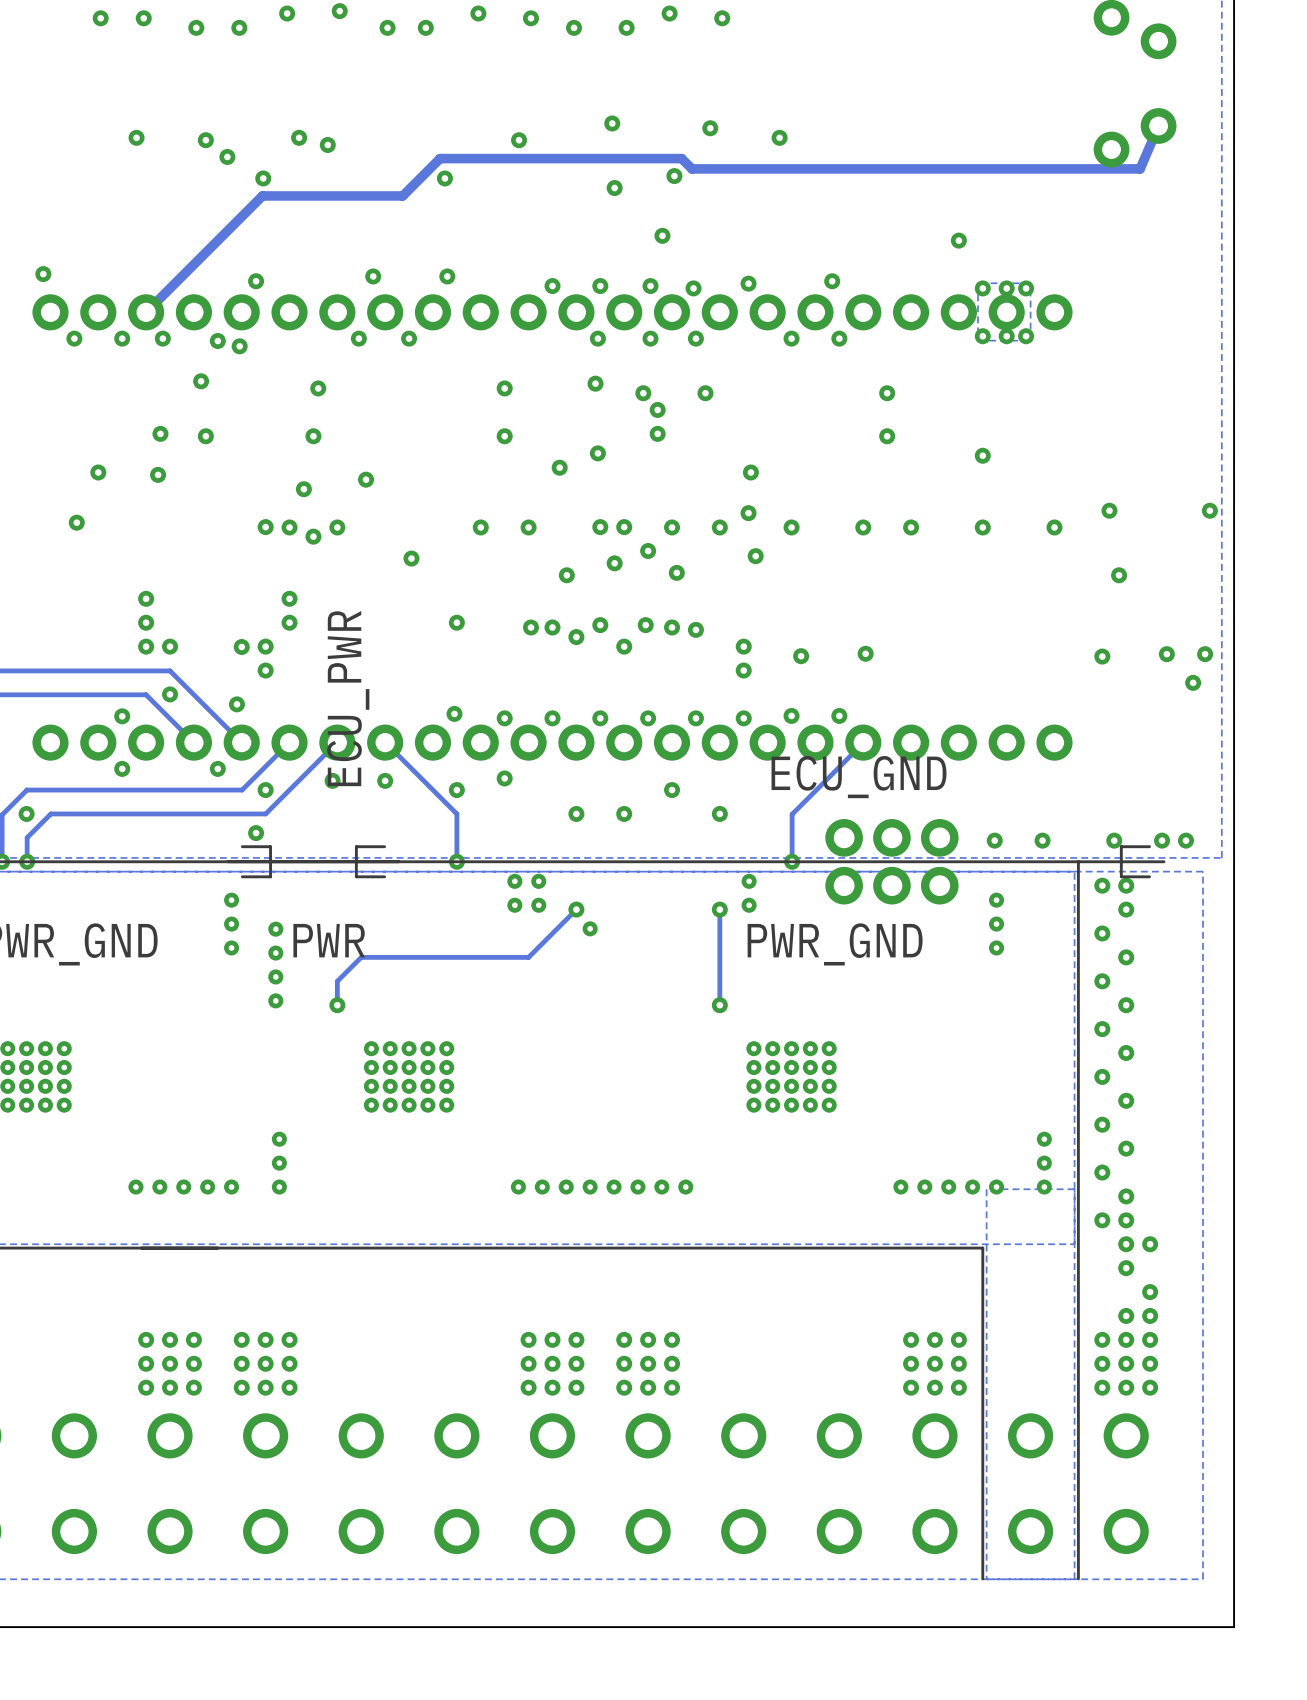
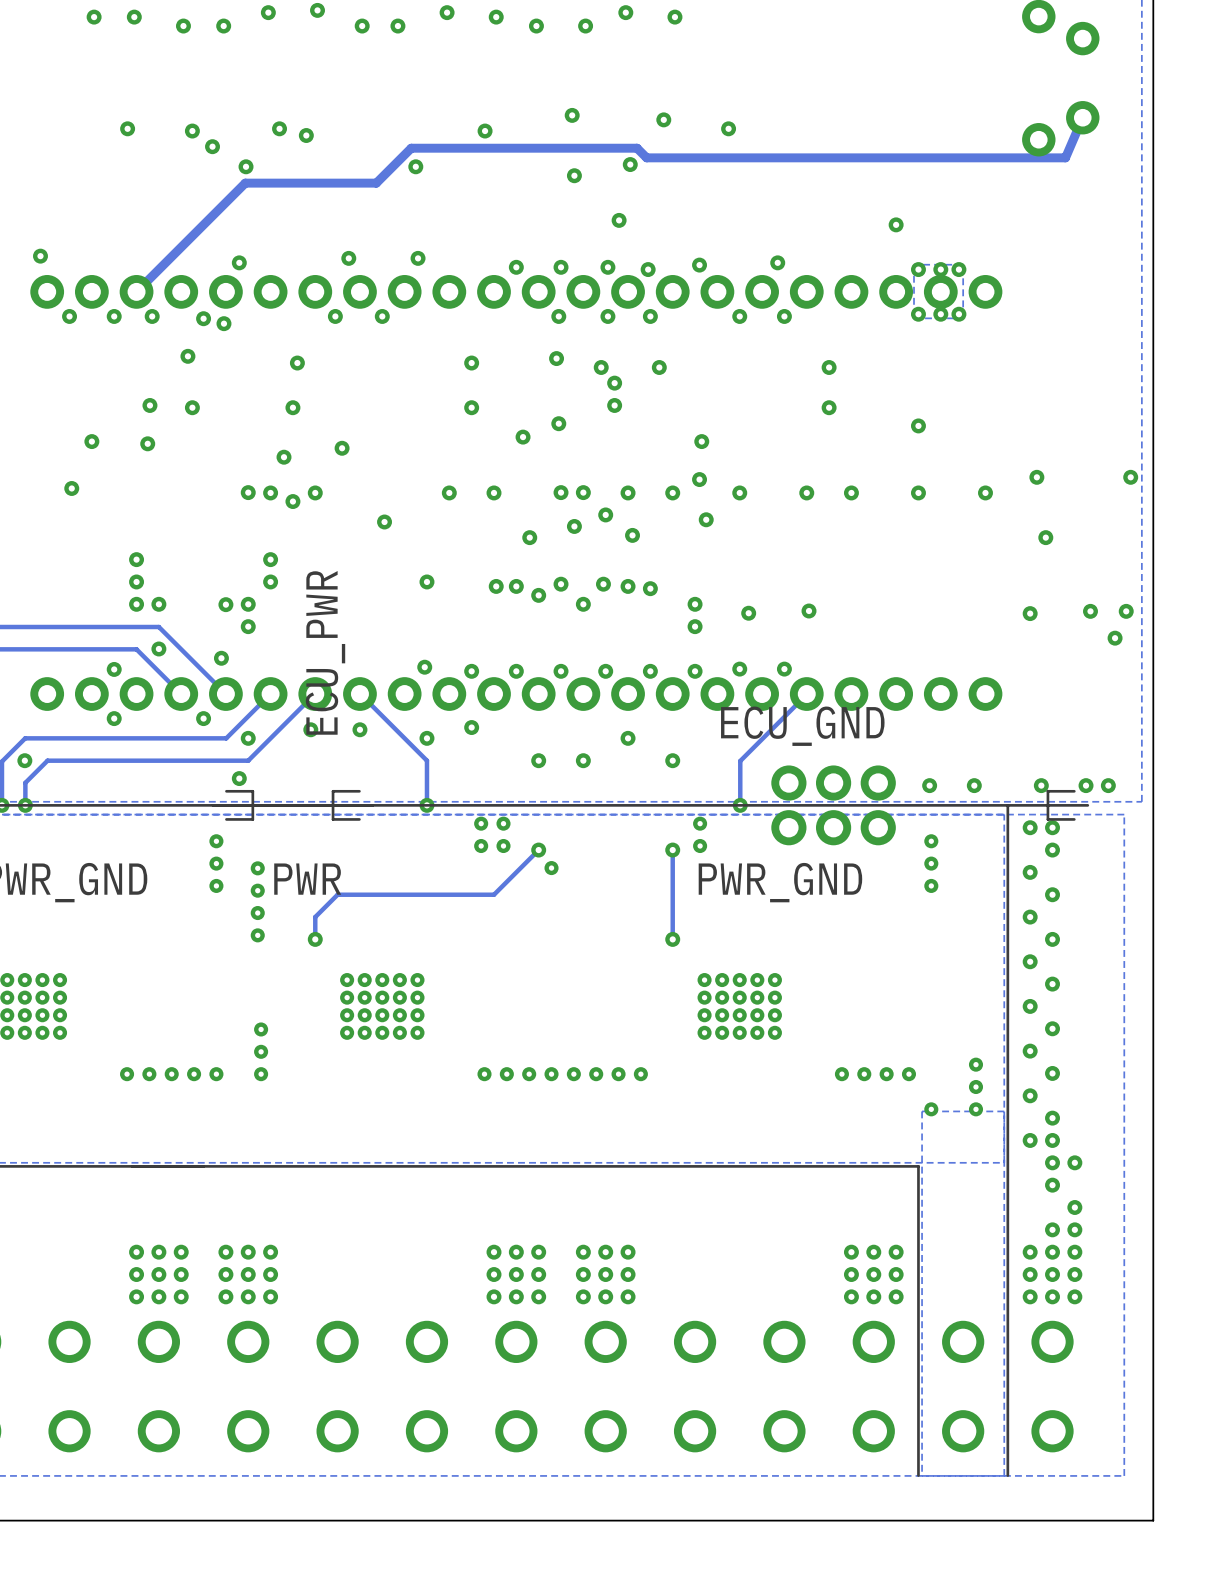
via: none -> (261, 1029)
via: none -> (261, 1051)
via: (279, 1139) -> none
via: none -> (127, 1074)
via: none -> (149, 1074)
via: none -> (171, 1074)
via: none -> (194, 1074)
via: none -> (216, 1074)
via: none -> (261, 1074)
via: none -> (484, 1074)
via: none -> (506, 1074)
via: none -> (529, 1074)
via: none -> (551, 1074)
via: none -> (573, 1074)
via: none -> (596, 1074)
via: none -> (618, 1074)
via: none -> (640, 1074)
via: none -> (841, 1074)
via: none -> (864, 1074)
via: none -> (886, 1074)
via: none -> (908, 1074)
via: (279, 1163) -> none
via: (135, 1187) -> none
via: (159, 1187) -> none
via: (183, 1187) -> none
via: (207, 1187) -> none
via: (231, 1187) -> none
via: (279, 1187) -> none
via: (518, 1187) -> none
via: (542, 1187) -> none
via: (566, 1187) -> none
via: (590, 1187) -> none
via: (614, 1187) -> none
via: (637, 1187) -> none
via: (661, 1187) -> none
via: (685, 1187) -> none
via: (900, 1187) -> none
via: (924, 1187) -> none
via: (948, 1187) -> none
via: (972, 1187) -> none

